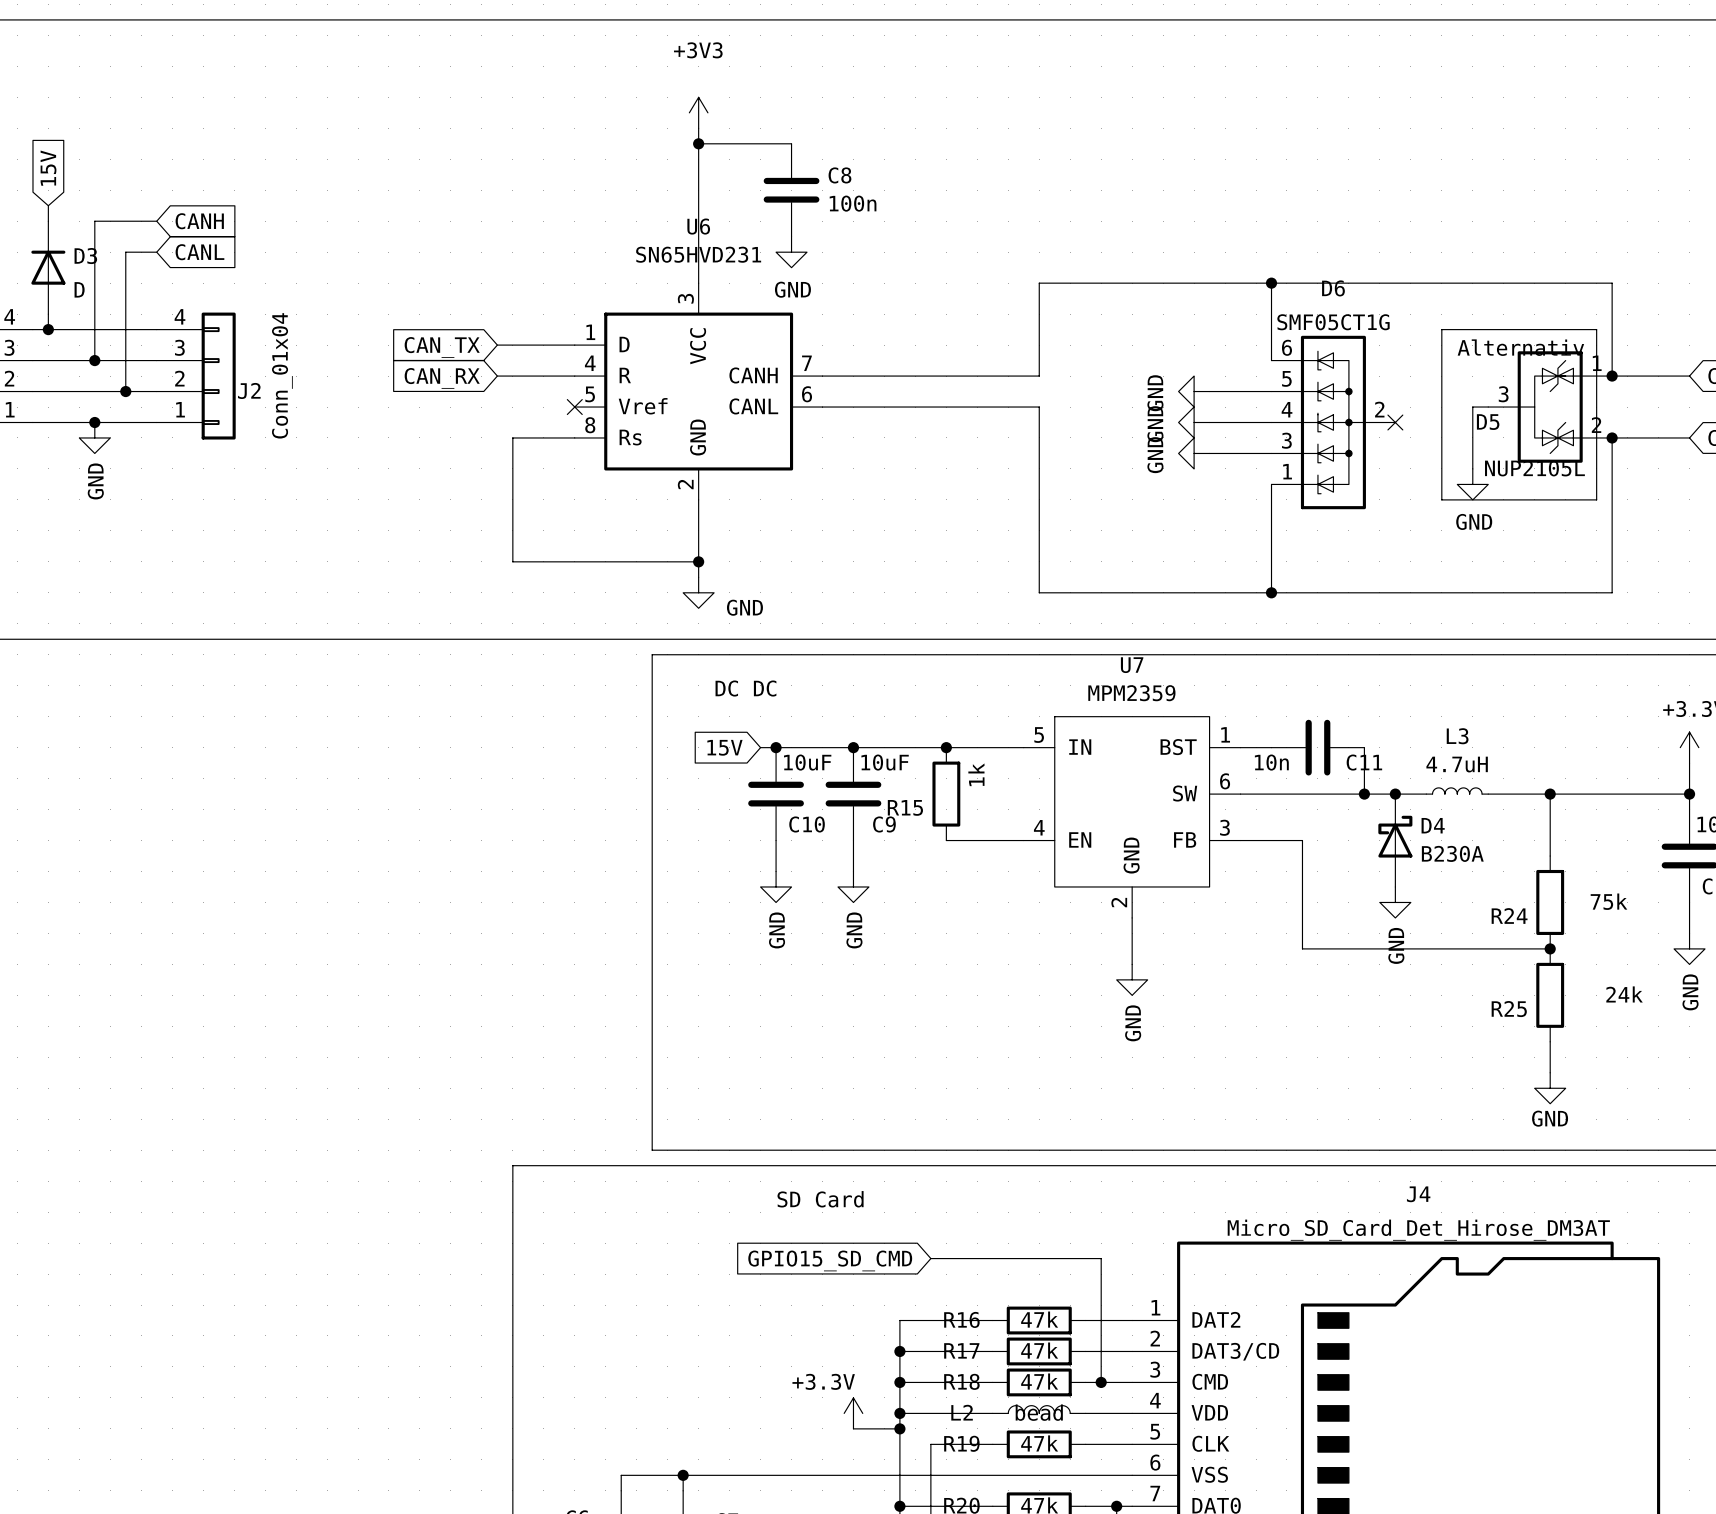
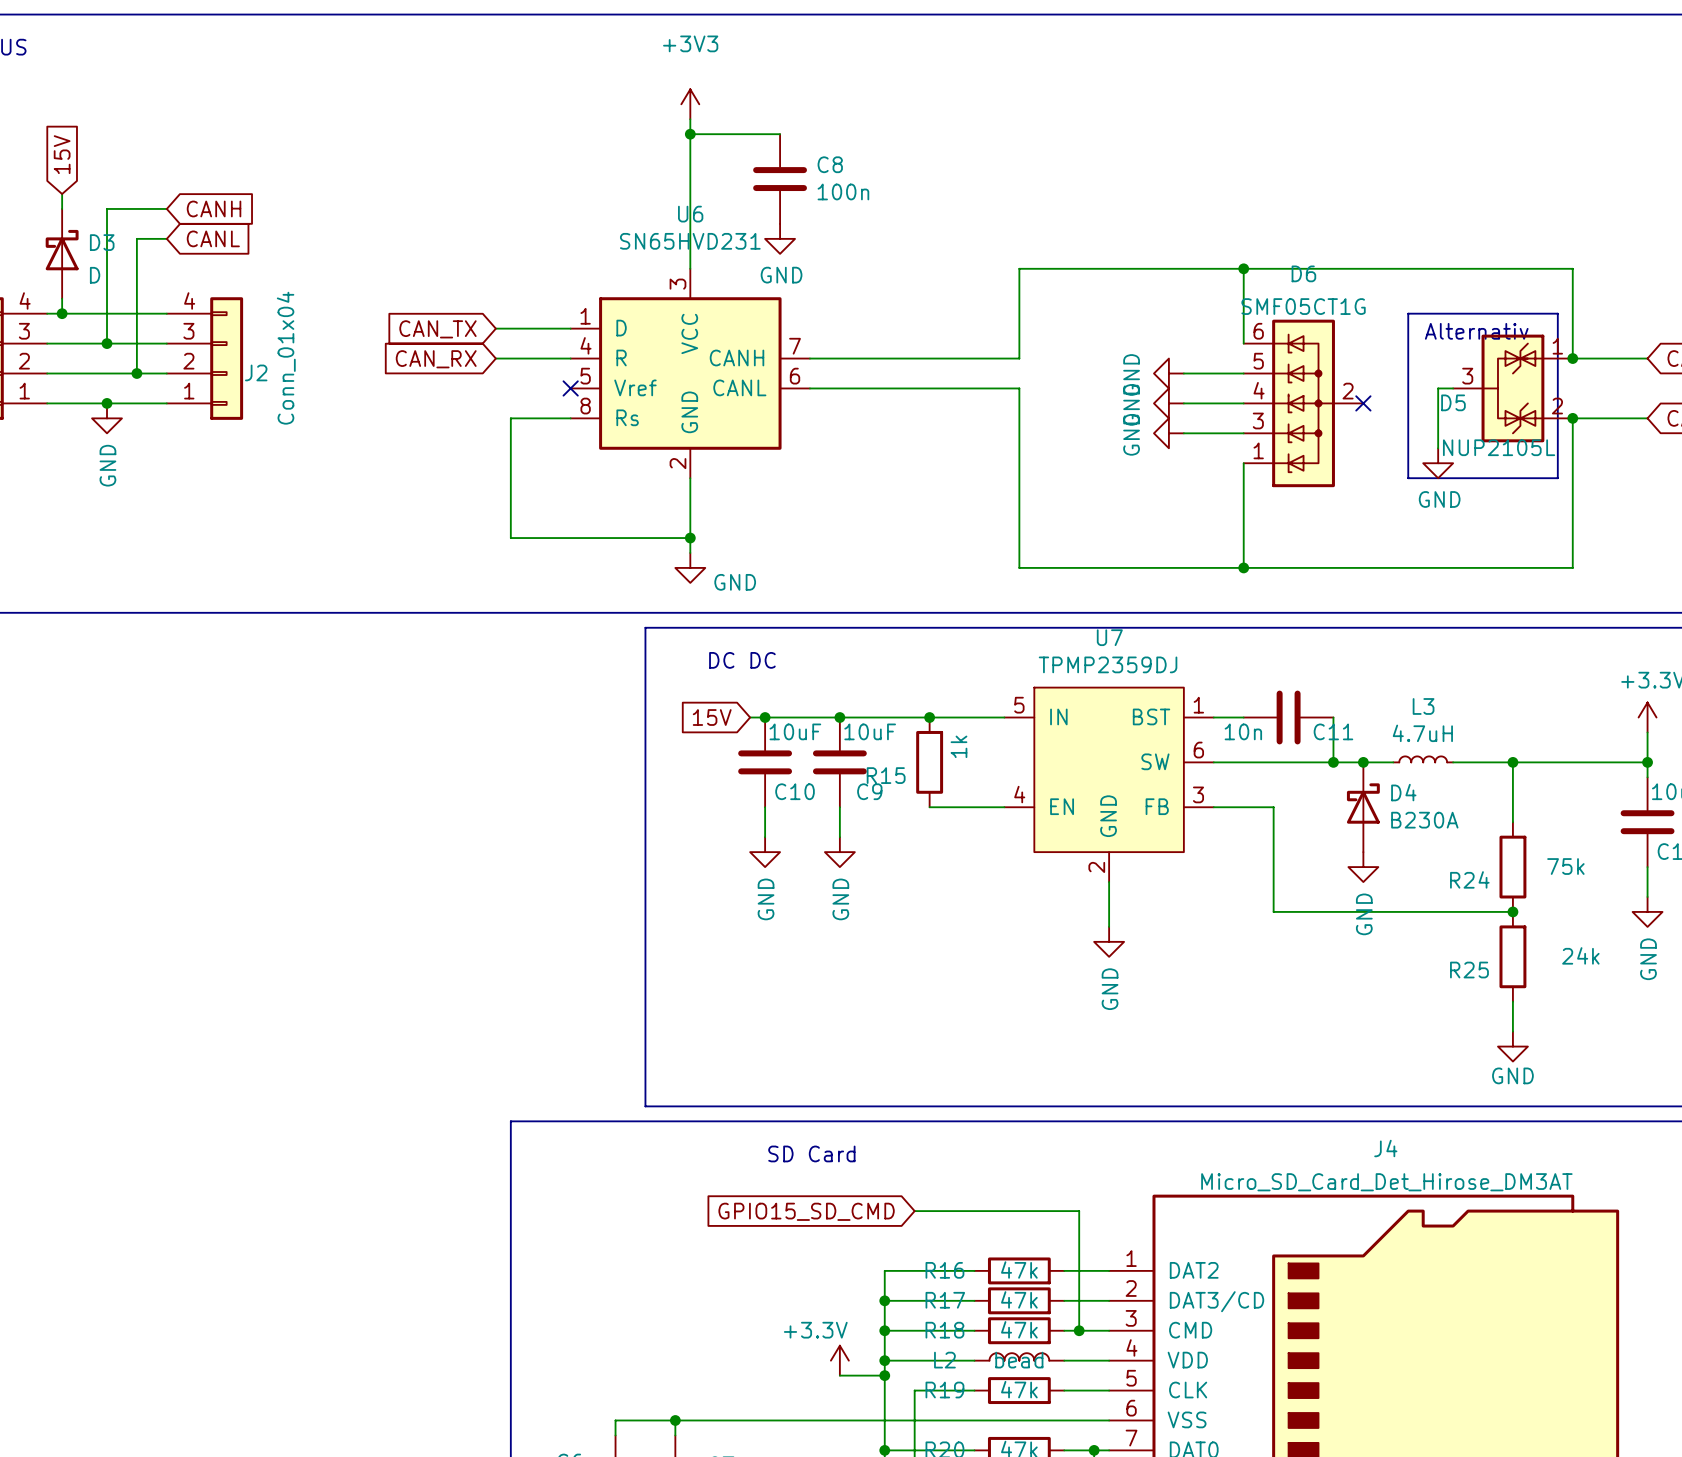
D3 symbol: [31, 221, 66, 315] -> [45, 208, 79, 299]
U7 value: MPM2359 (1131, 693) -> TPMP2359DJ (1108, 664)

